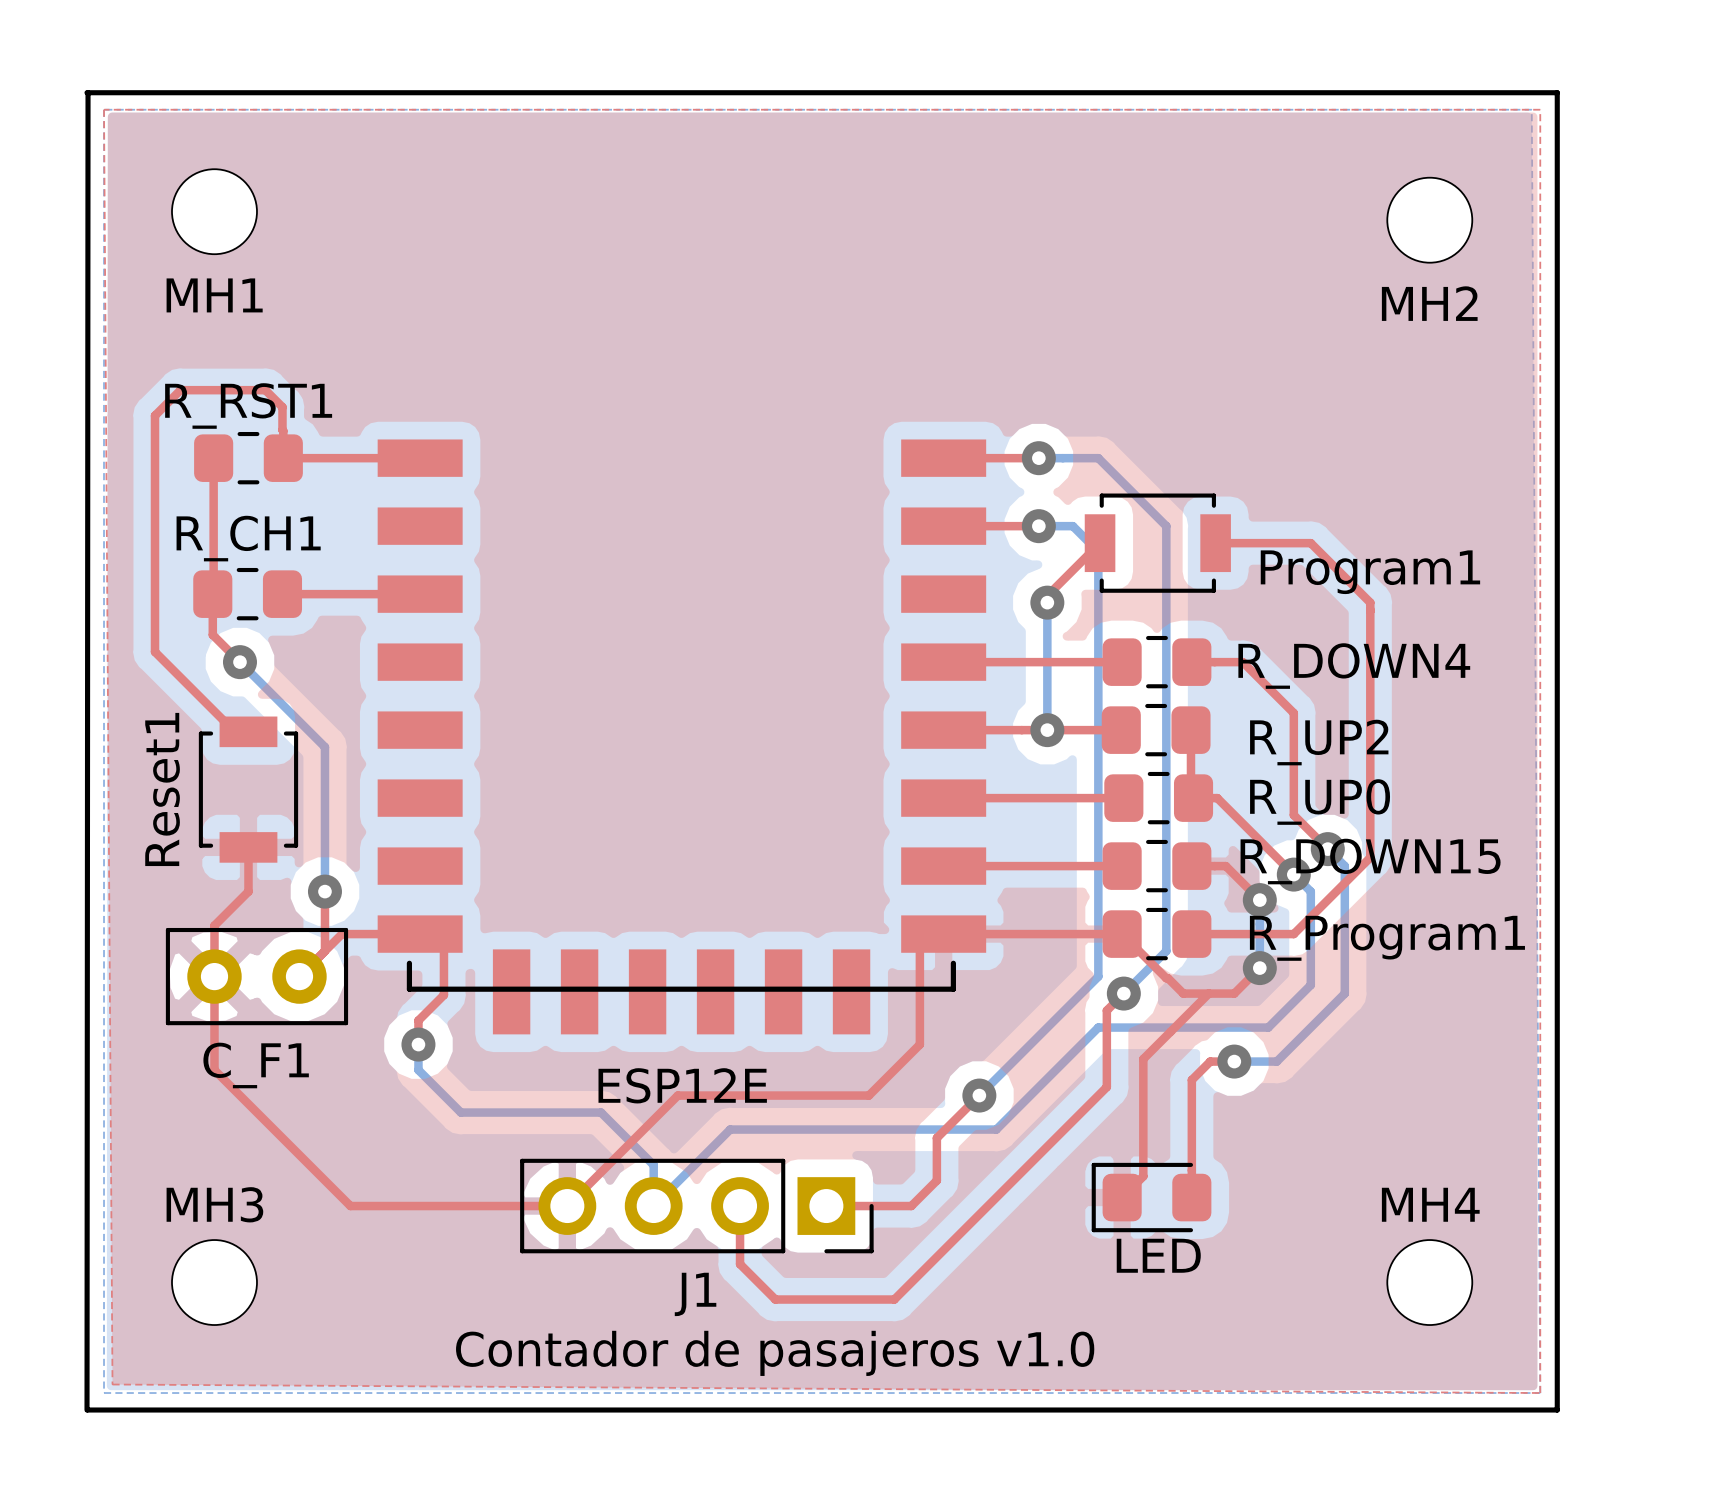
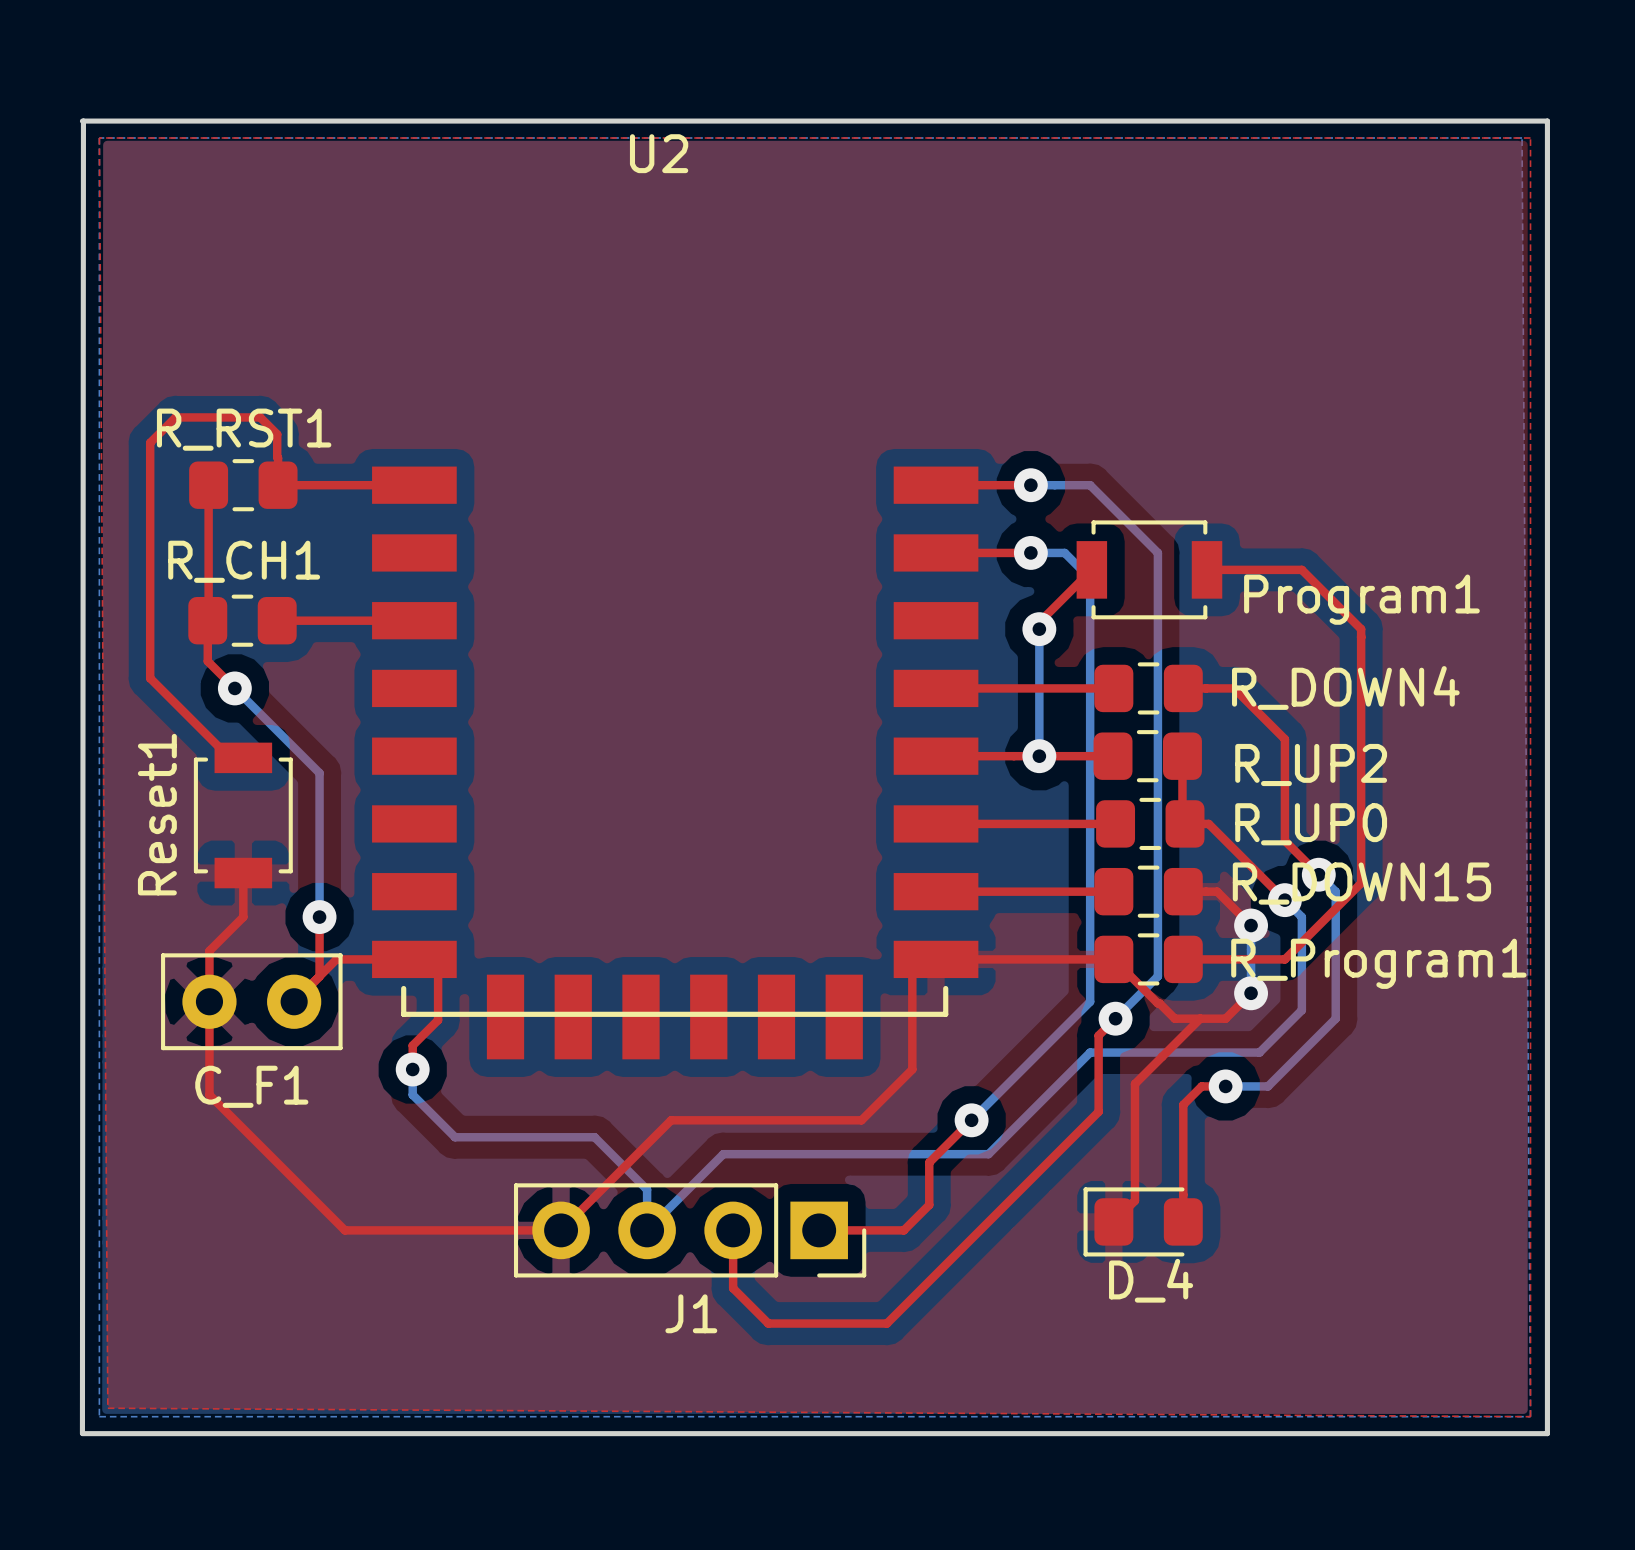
MH1: (214, 211) -> none
MH2: (1429, 220) -> none
ESP12E name: ESP12E (682, 1085) -> U2 (659, 153)
LED name: LED (1158, 1255) -> D_4 (1151, 1280)
MH3: (214, 1282) -> none
MH4: (1429, 1282) -> none
text: Contador de pasajeros v1.0 (775, 1353) -> none

